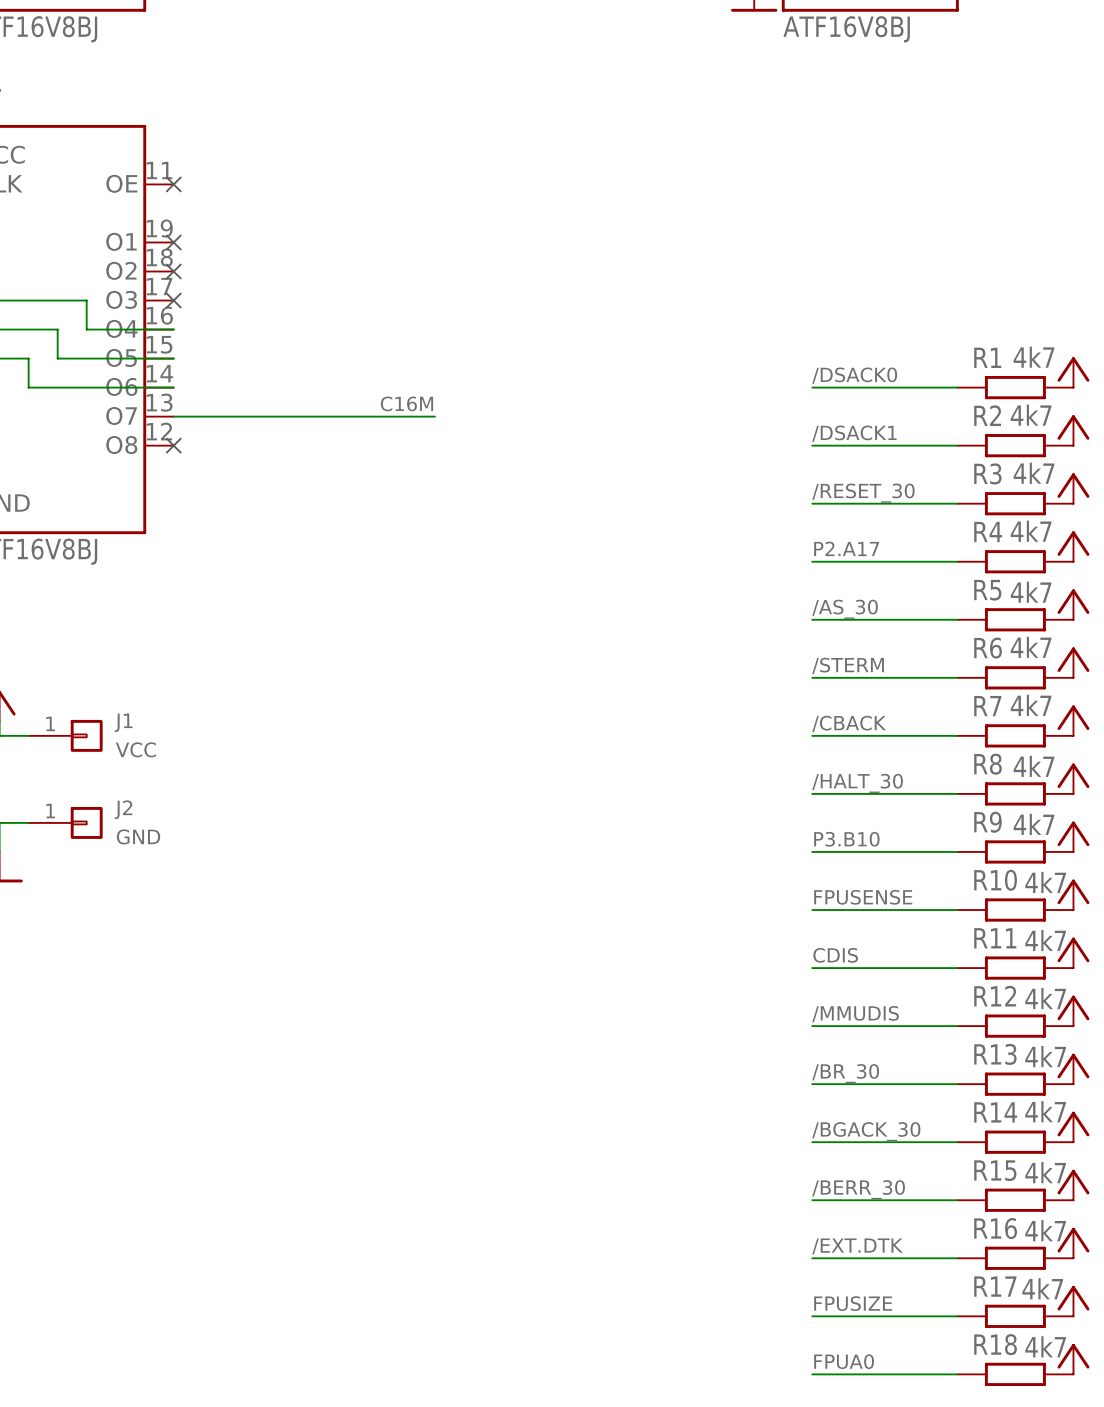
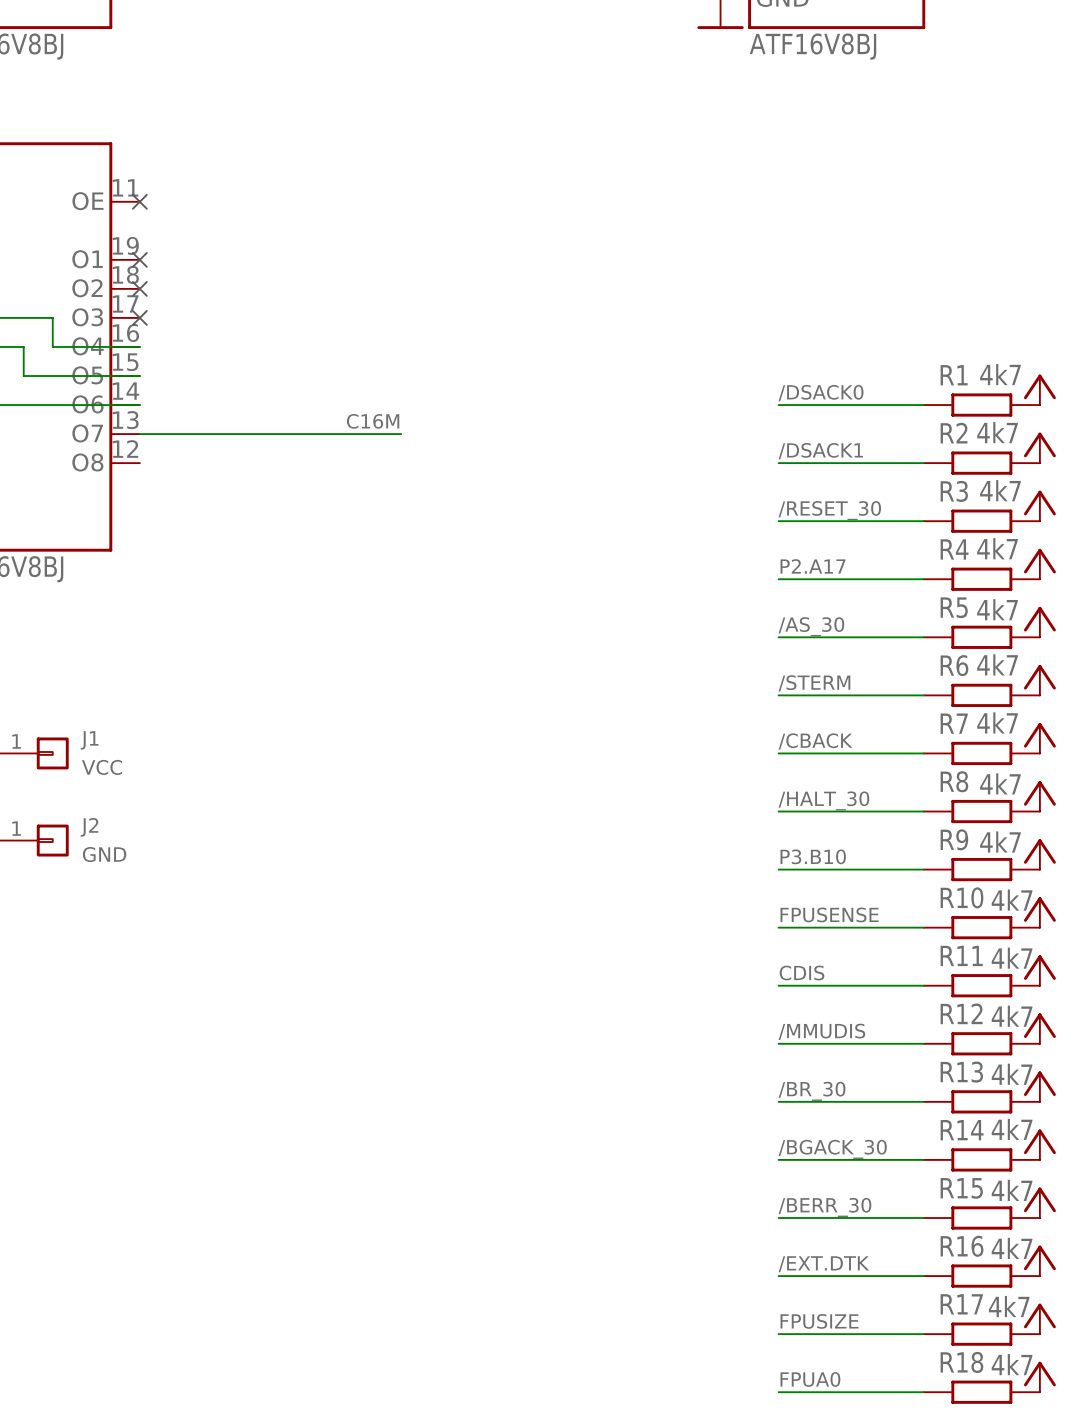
no-connect mark: (173, 445) -> none

